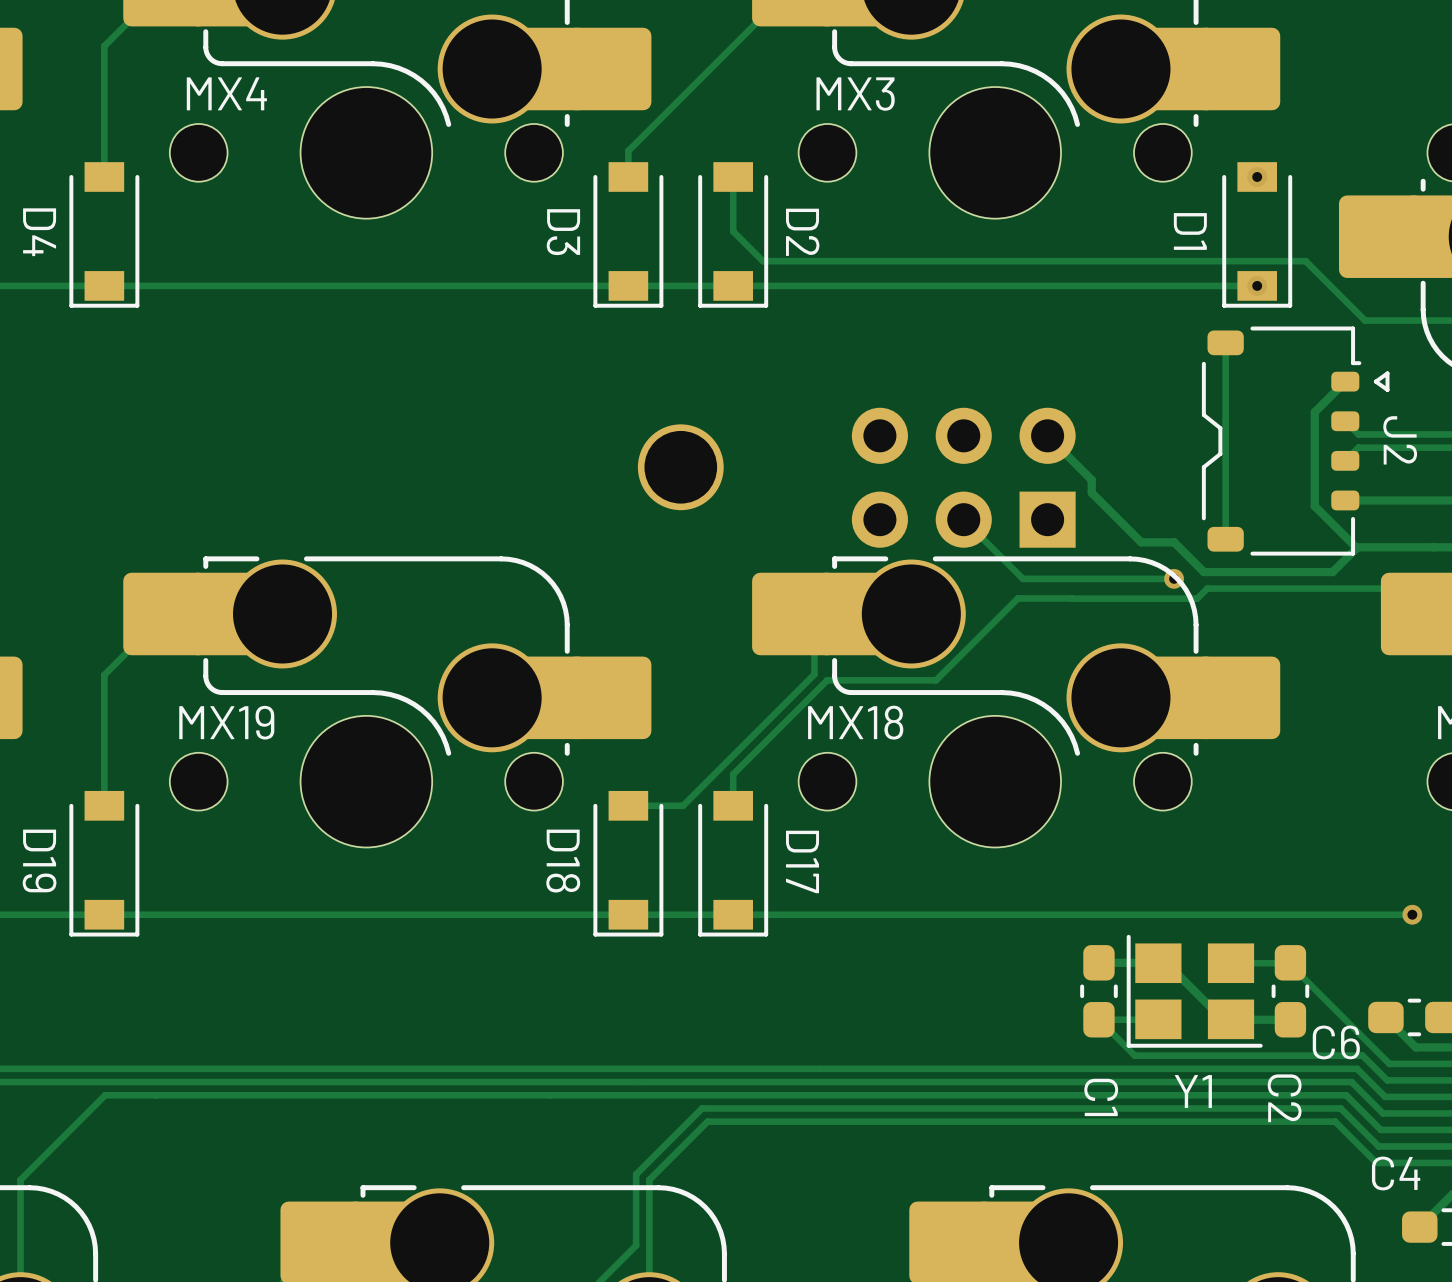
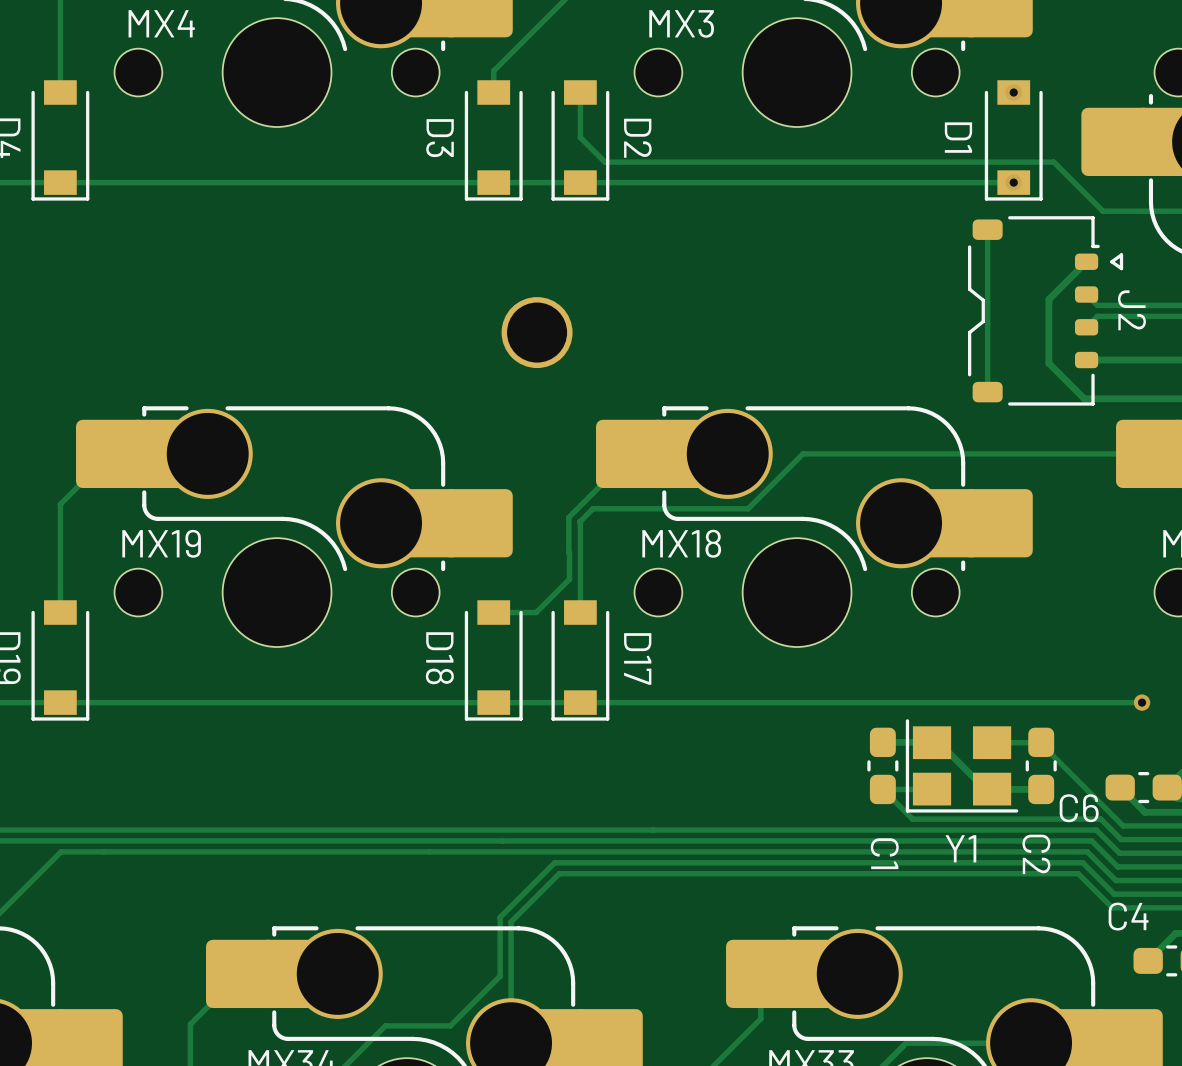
track: (1314, 412) (1314, 506) (1355, 547) (1332, 572) (1203, 572) (1174, 542) (1141, 542) (1091, 492) (1091, 479) (1047, 435) -> (1061, 287) (1048, 299) (1048, 363) (1084, 398) (1095, 398)
part: (963, 477) -> none
track: (963, 519) (1022, 578) (1174, 578) -> none
via: (1174, 578) -> none
track: (1071, 598) (1017, 598) (1002, 613) -> none
track: (1072, 598) (1197, 598) (1207, 588) (1397, 588) (1423, 613) -> (803, 453) (1150, 453)
track: (794, 613) (814, 634) (814, 674) (683, 805) (679, 805) -> (630, 453) (568, 517) (569, 579) (536, 612)
track: (827, 680) (733, 774) -> (658, 508) (592, 508) (579, 521) (580, 586)

